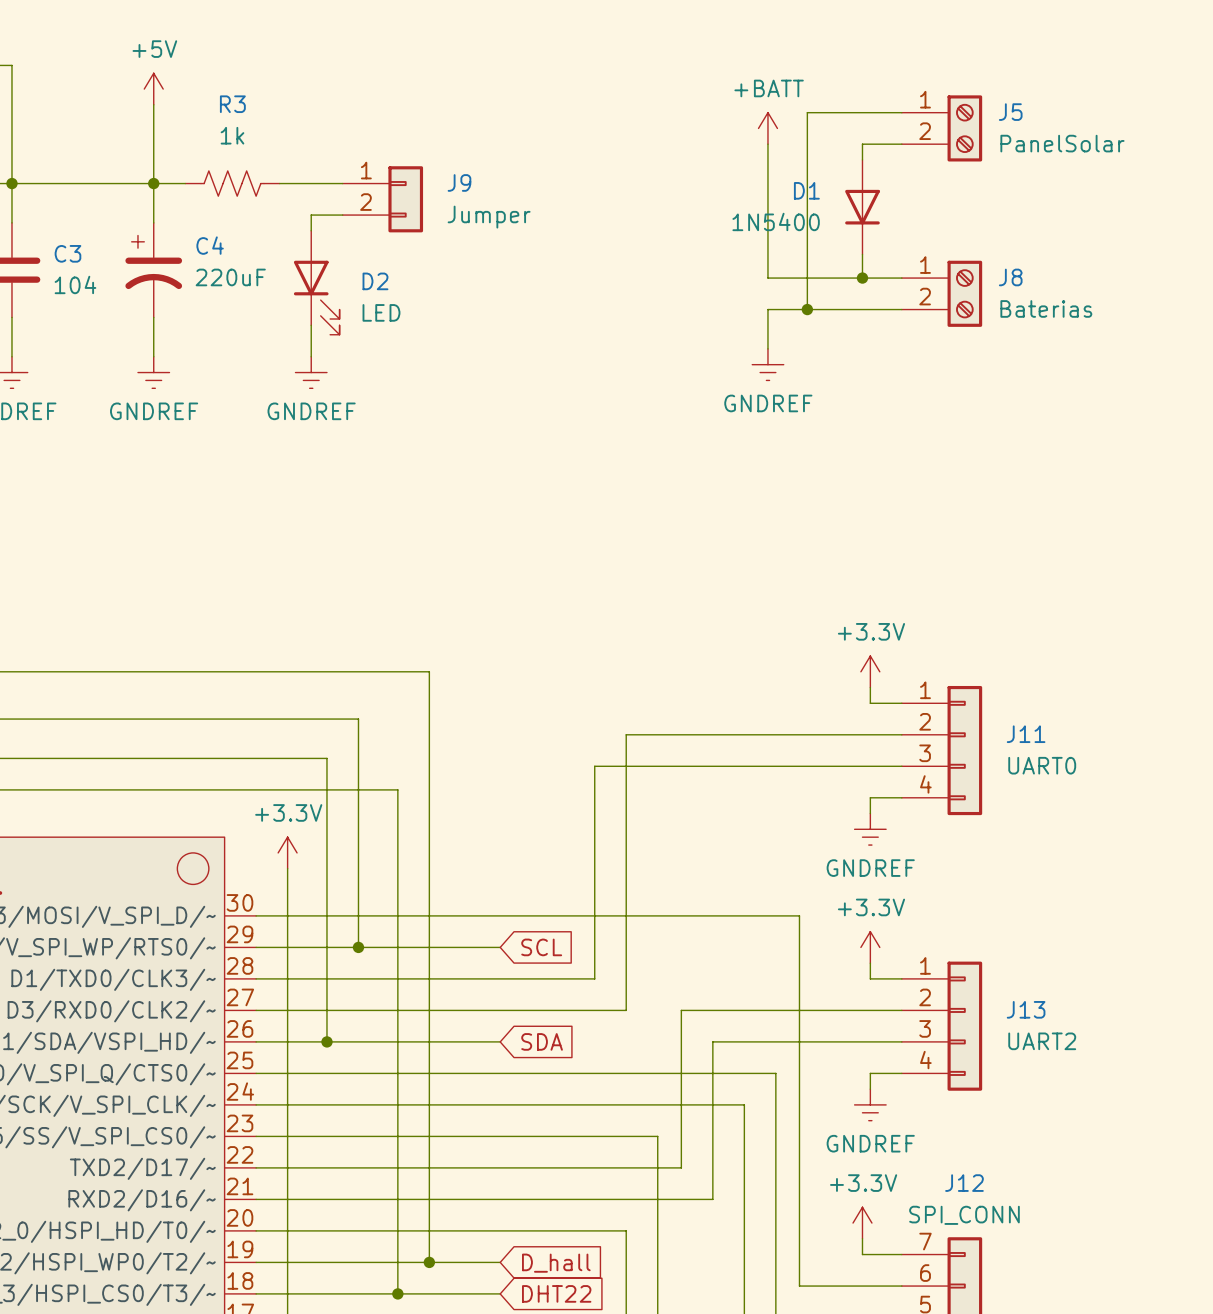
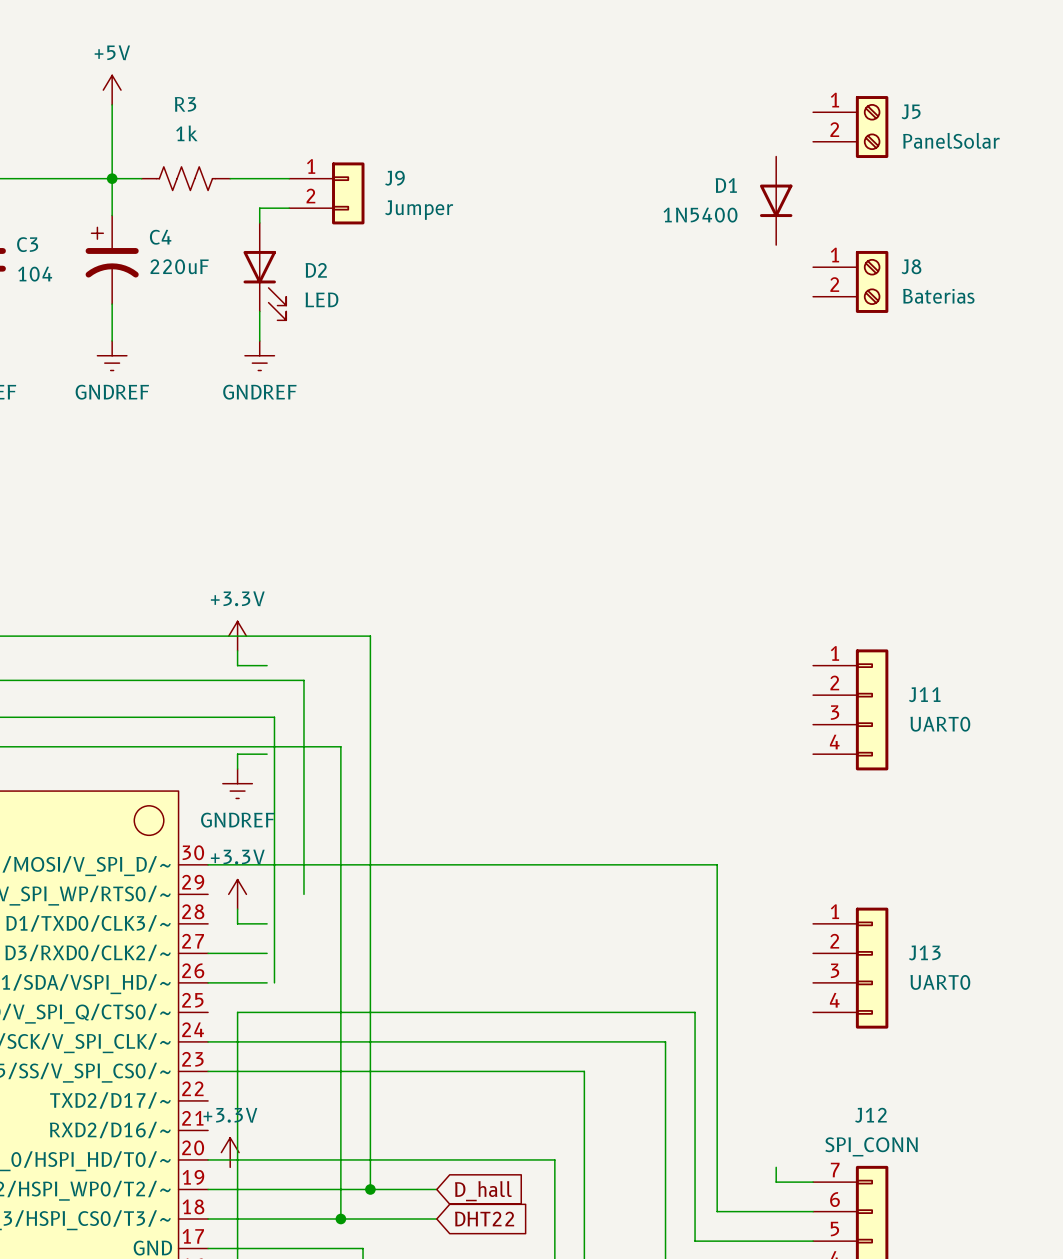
wire: (901, 112) (807, 112) (807, 309) -> none
power symbol: +BATT (767, 128) -> none
wire: (767, 144) (767, 278) (901, 278) -> none
wire: (901, 144) (862, 144) (862, 159) -> none
wire: (862, 254) (862, 278) -> none
junction: (862, 278) -> none
junction: (807, 309) -> none
wire: (901, 309) (767, 309) (767, 348) -> none
power symbol: GNDREF (767, 364) -> none
power symbol: none -> +3.3V (237, 636)
power symbol: +3.3V (870, 671) -> none
wire: none -> (237, 650) (237, 665) (267, 665)
wire: (870, 687) (870, 703) (901, 703) -> none
wire: (901, 734) (626, 734) (626, 1010) (319, 1010) -> none
wire: (901, 766) (594, 766) (594, 978) (319, 978) -> none
wire: none -> (267, 754) (237, 754) (237, 768)
wire: (901, 797) (870, 797) (870, 813) -> none
power symbol: none -> GNDREF (237, 783)
power symbol: GNDREF (870, 829) -> none
power symbol: +3.3V (287, 852) -> none
wire: (287, 868) (287, 963) -> none
wire: (256, 947) (500, 947) -> none
power symbol: none -> +3.3V (237, 894)
junction: (358, 947) -> none
global label: SCL (541, 947) -> none
power symbol: +3.3V (870, 947) -> none
wire: (870, 963) (870, 978) (901, 978) -> none
wire: (256, 978) (287, 978) (287, 1073) (256, 1073) -> none
wire: (901, 1010) (681, 1010) (681, 1167) (256, 1167) -> none
wire: (319, 1041) (500, 1041) -> none
junction: (326, 1041) -> none
global label: SDA (542, 1041) -> none
wire: (901, 1041) (712, 1041) (712, 1199) (256, 1199) -> none
J13 value: UART2 (1042, 1041) -> UART0 (940, 982)
wire: (901, 1073) (870, 1073) (870, 1089) -> none
power symbol: GNDREF (870, 1104) -> none
power symbol: none -> +3.3V (230, 1152)
power symbol: +3.3V (862, 1223) -> none

